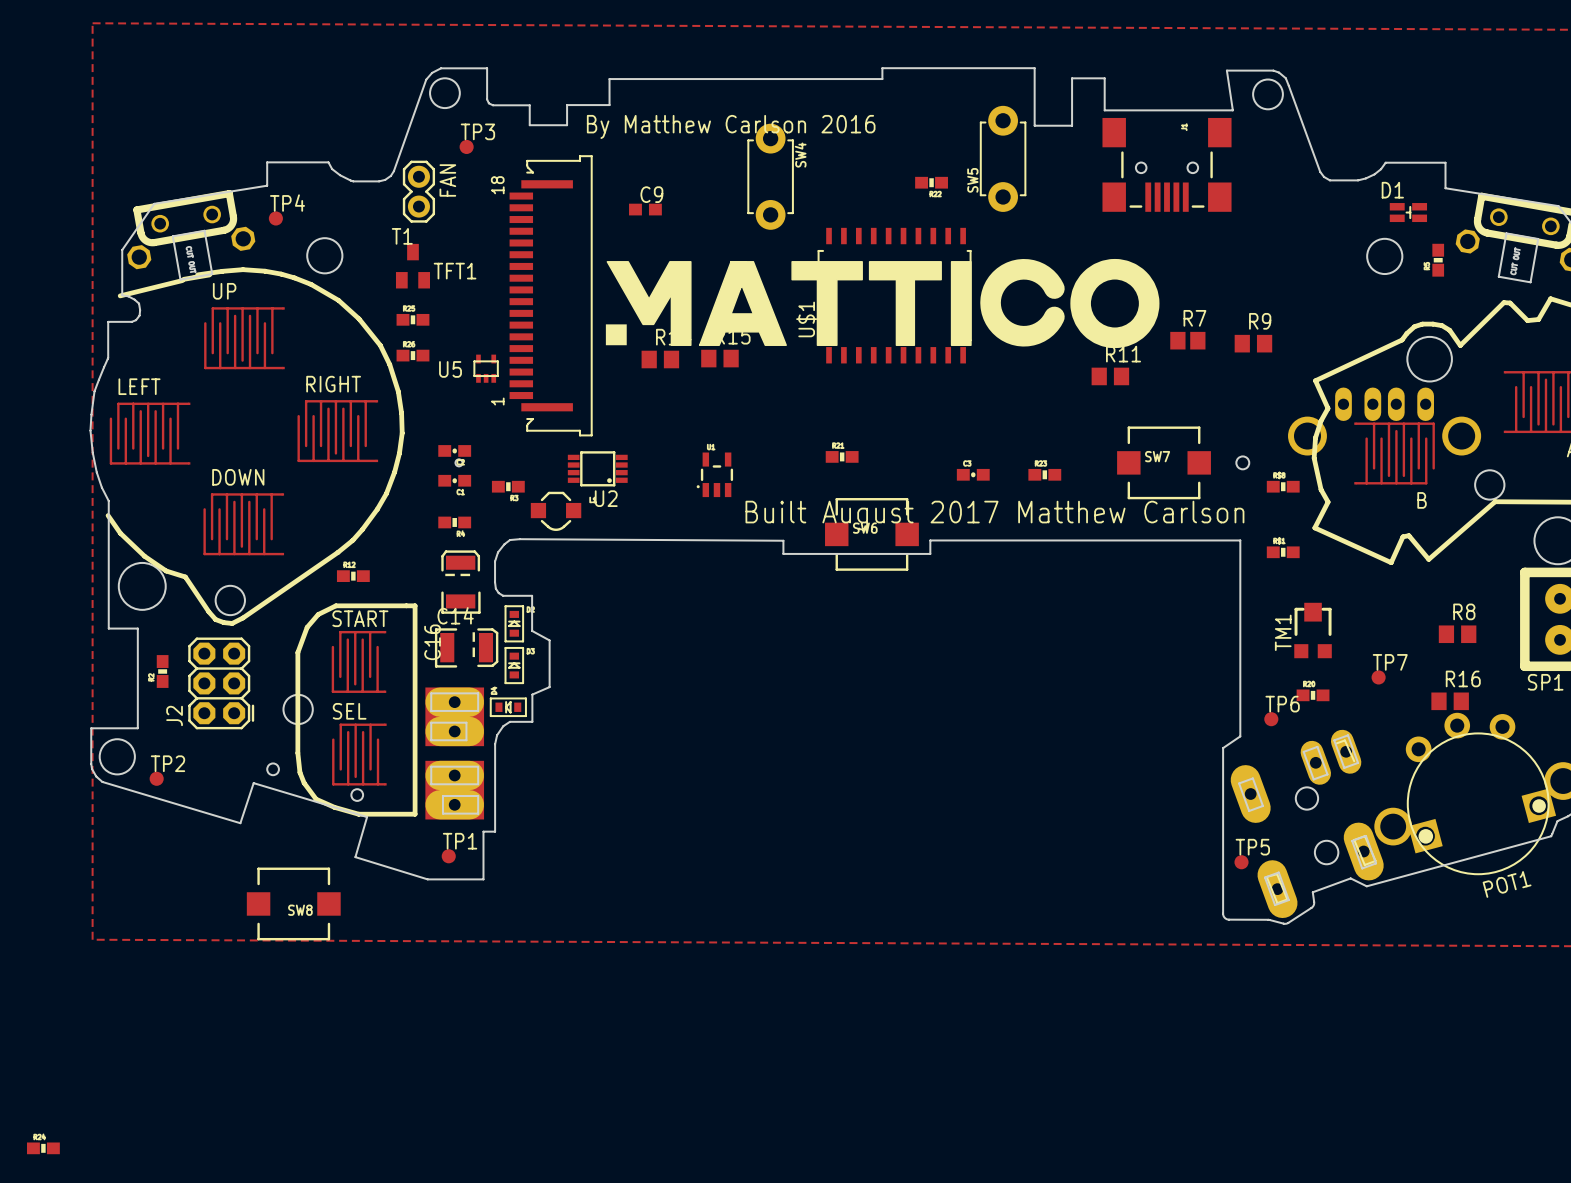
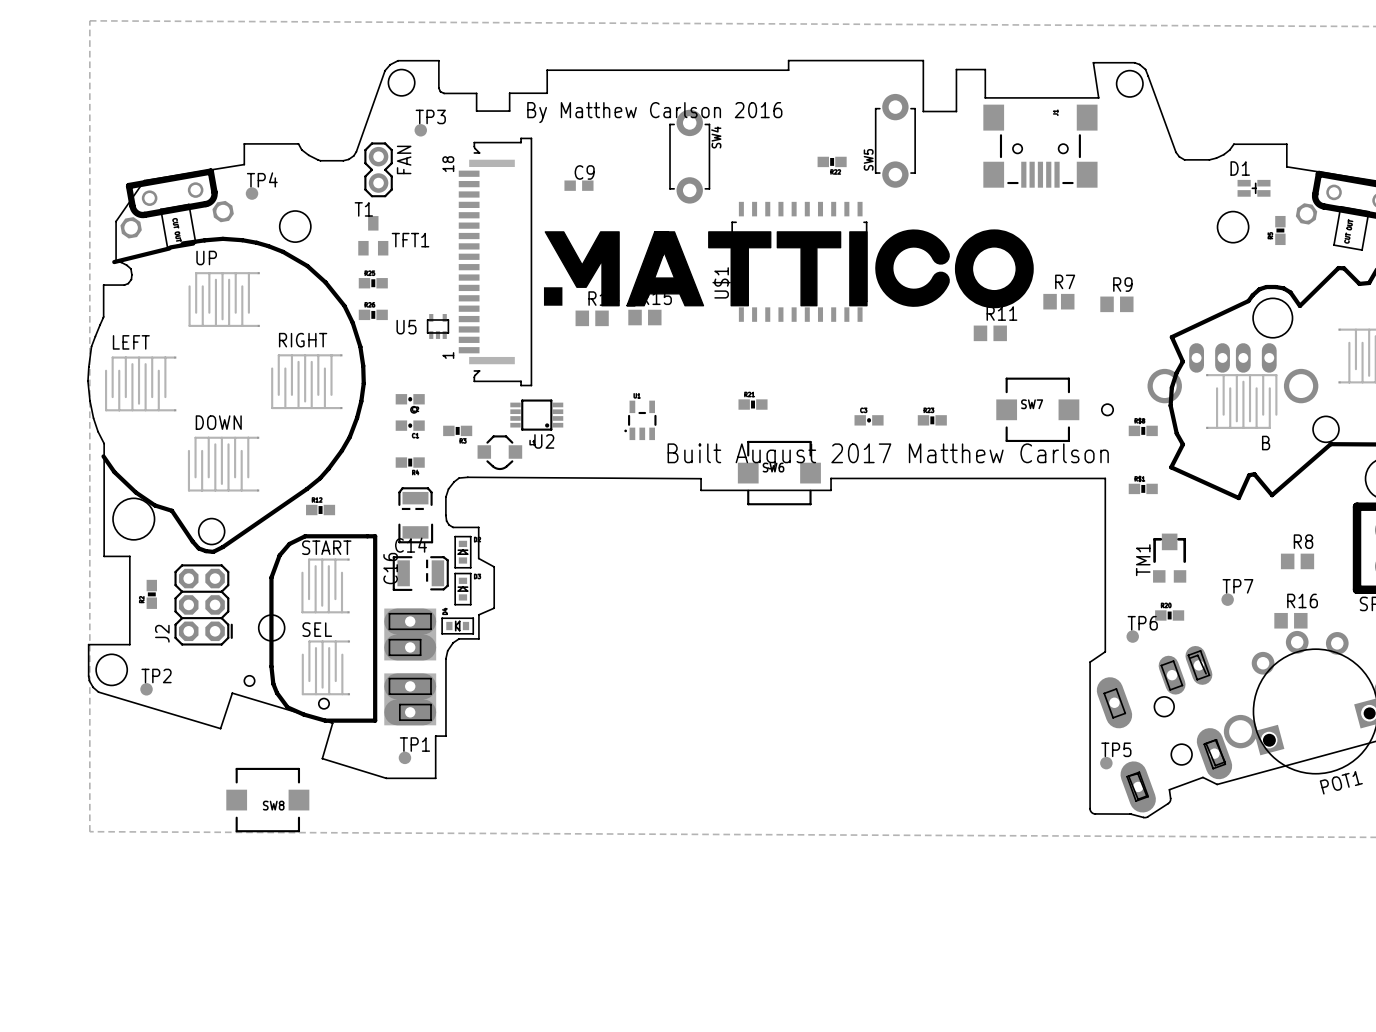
part: (43, 1148) -> none

